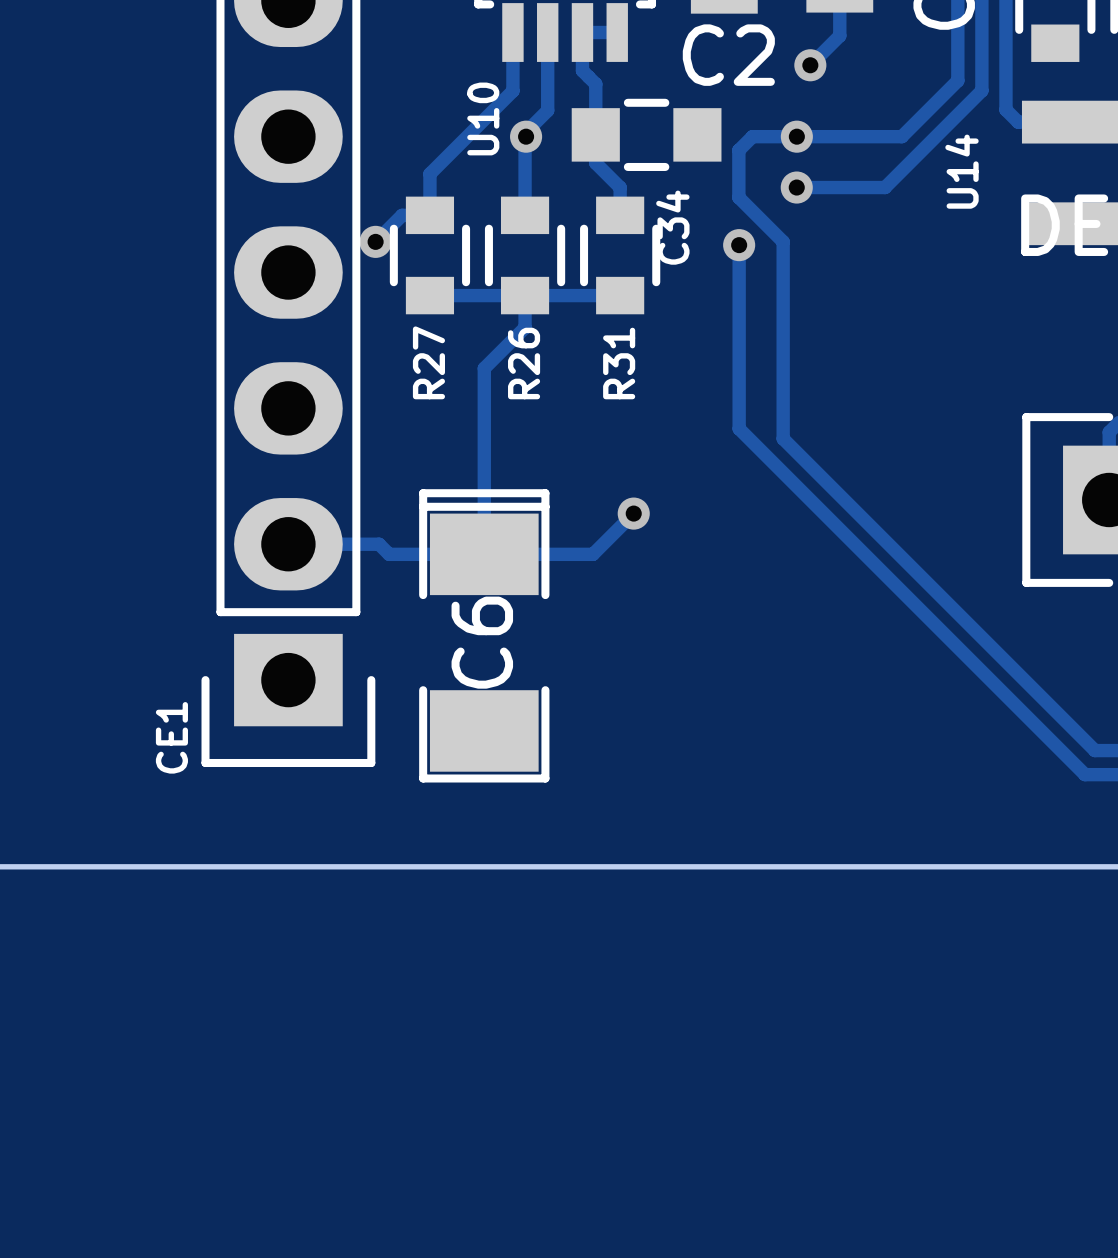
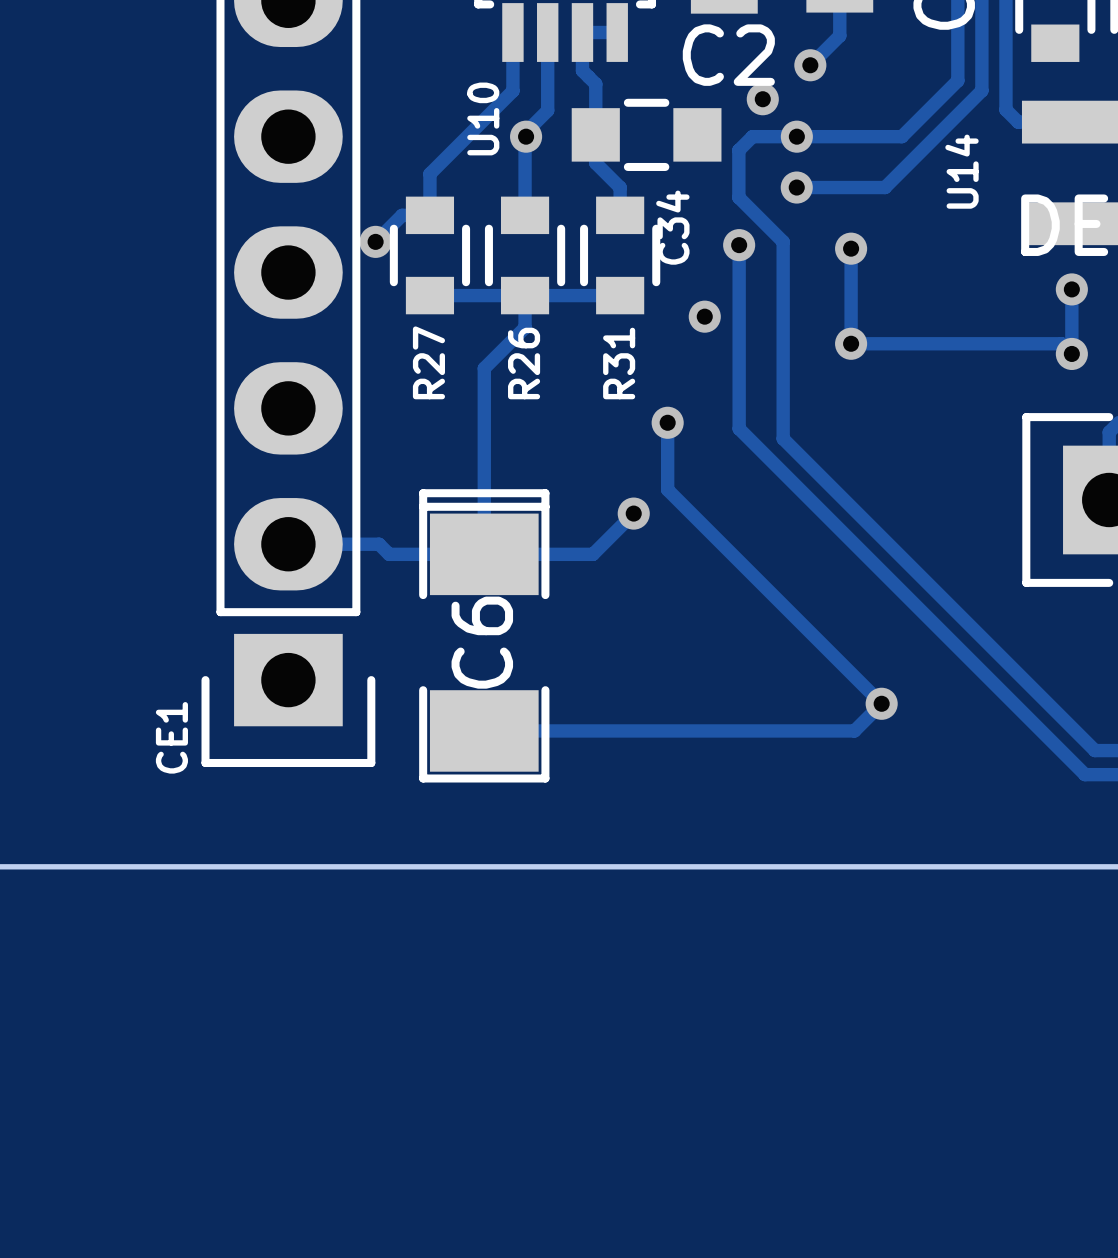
via: none -> (762, 99)
track: none -> (851, 248) (851, 343) (1061, 343) (1071, 353) (1071, 289)
via: none -> (851, 248)
via: none -> (1071, 289)
via: none -> (704, 316)
via: none -> (851, 343)
via: none -> (1071, 353)
track: none -> (667, 422) (667, 489) (881, 703) (854, 730) (484, 730)
via: none -> (667, 422)
via: none -> (881, 703)

